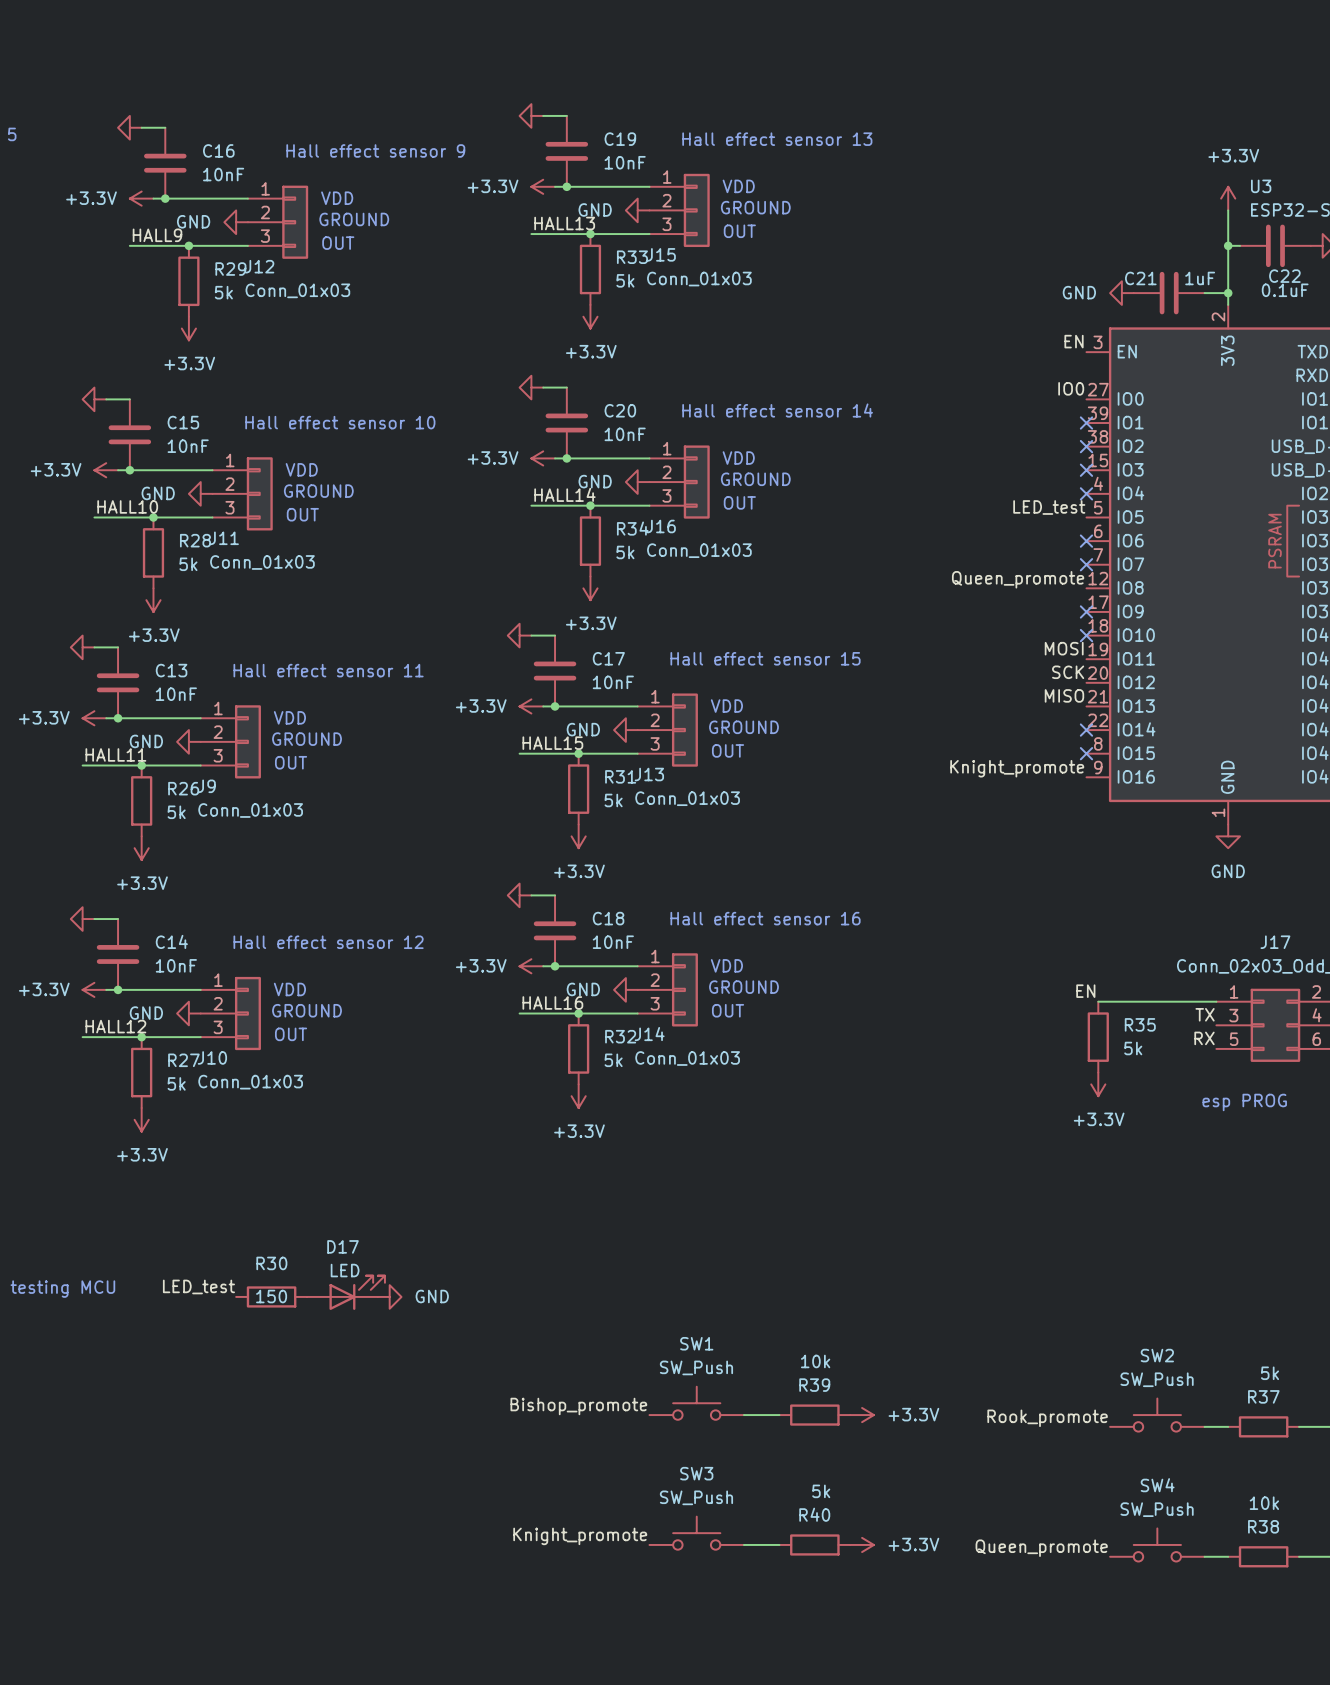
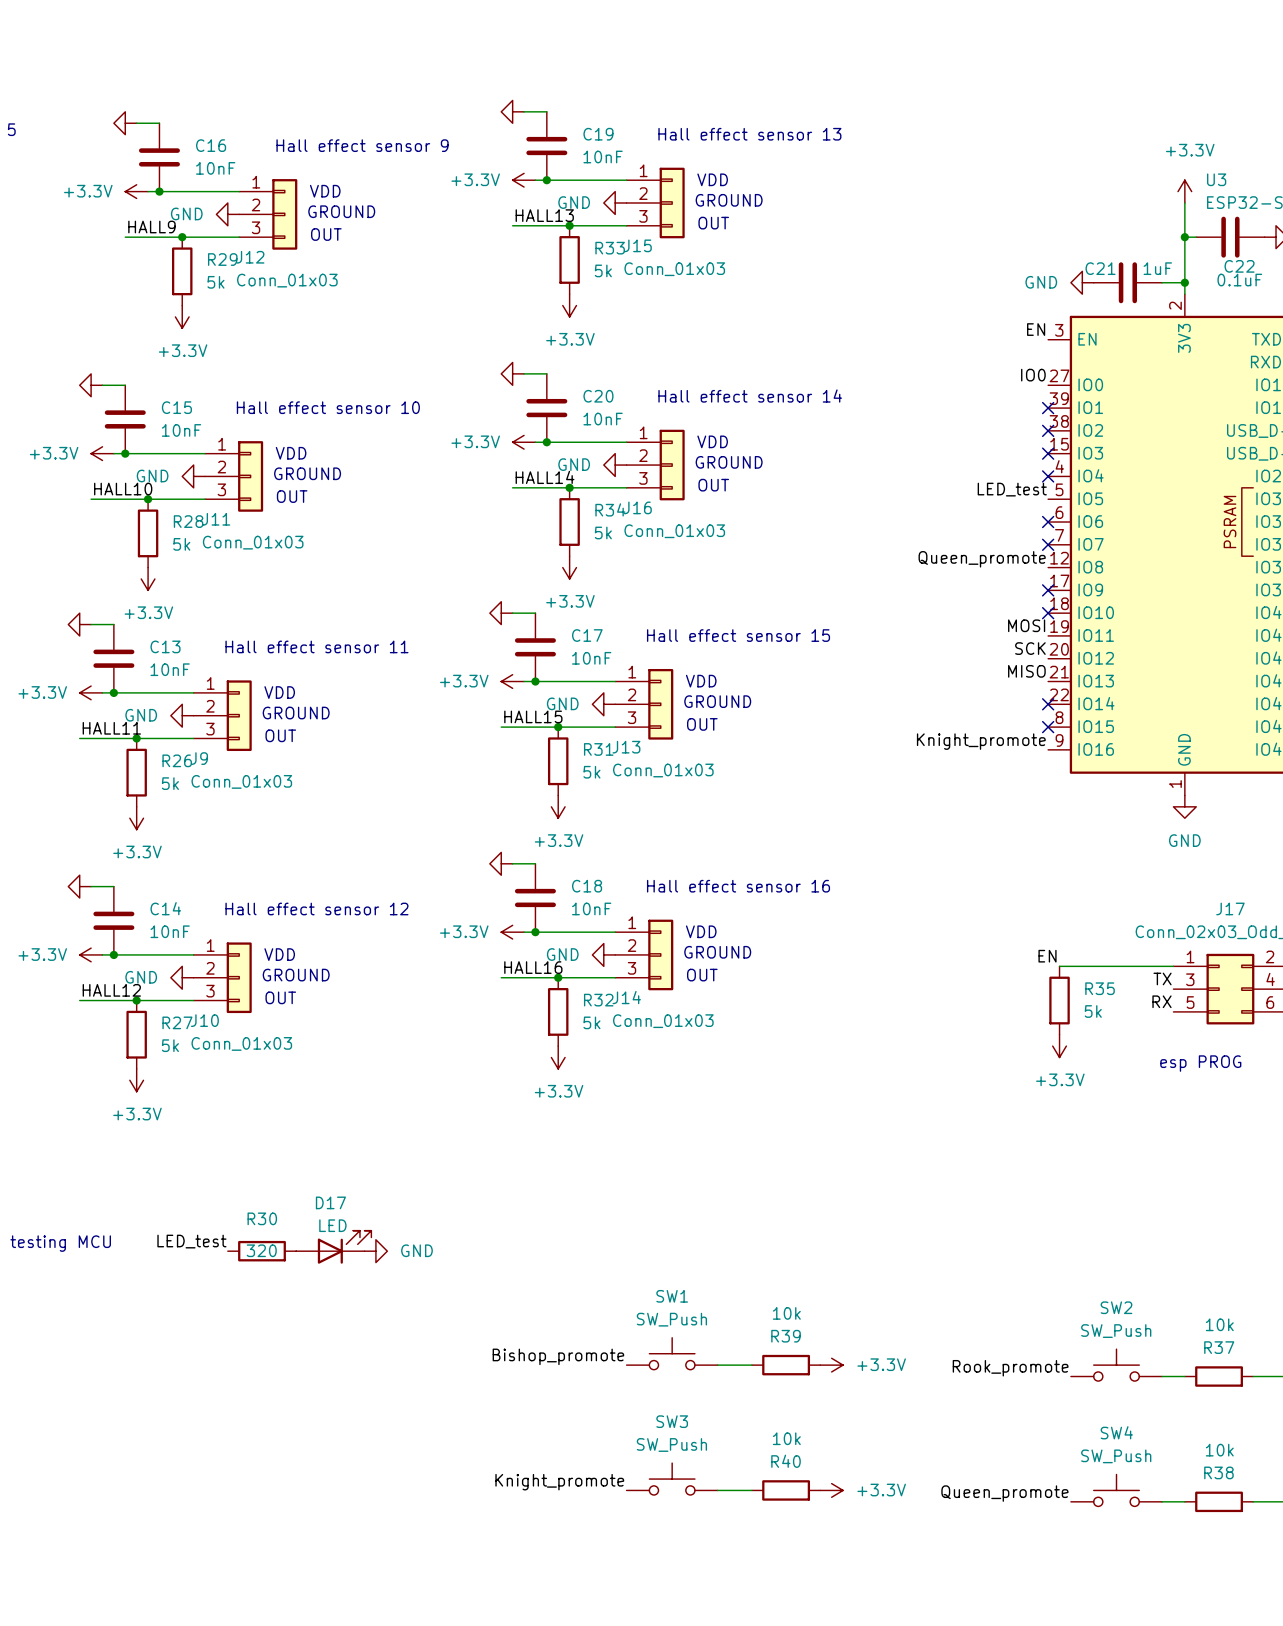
R30 value: 150 (271, 1296) -> 320 (261, 1250)
R37 value: 5k (1270, 1373) -> 10k (1219, 1324)
R40 value: 5k (821, 1491) -> 10k (786, 1438)

